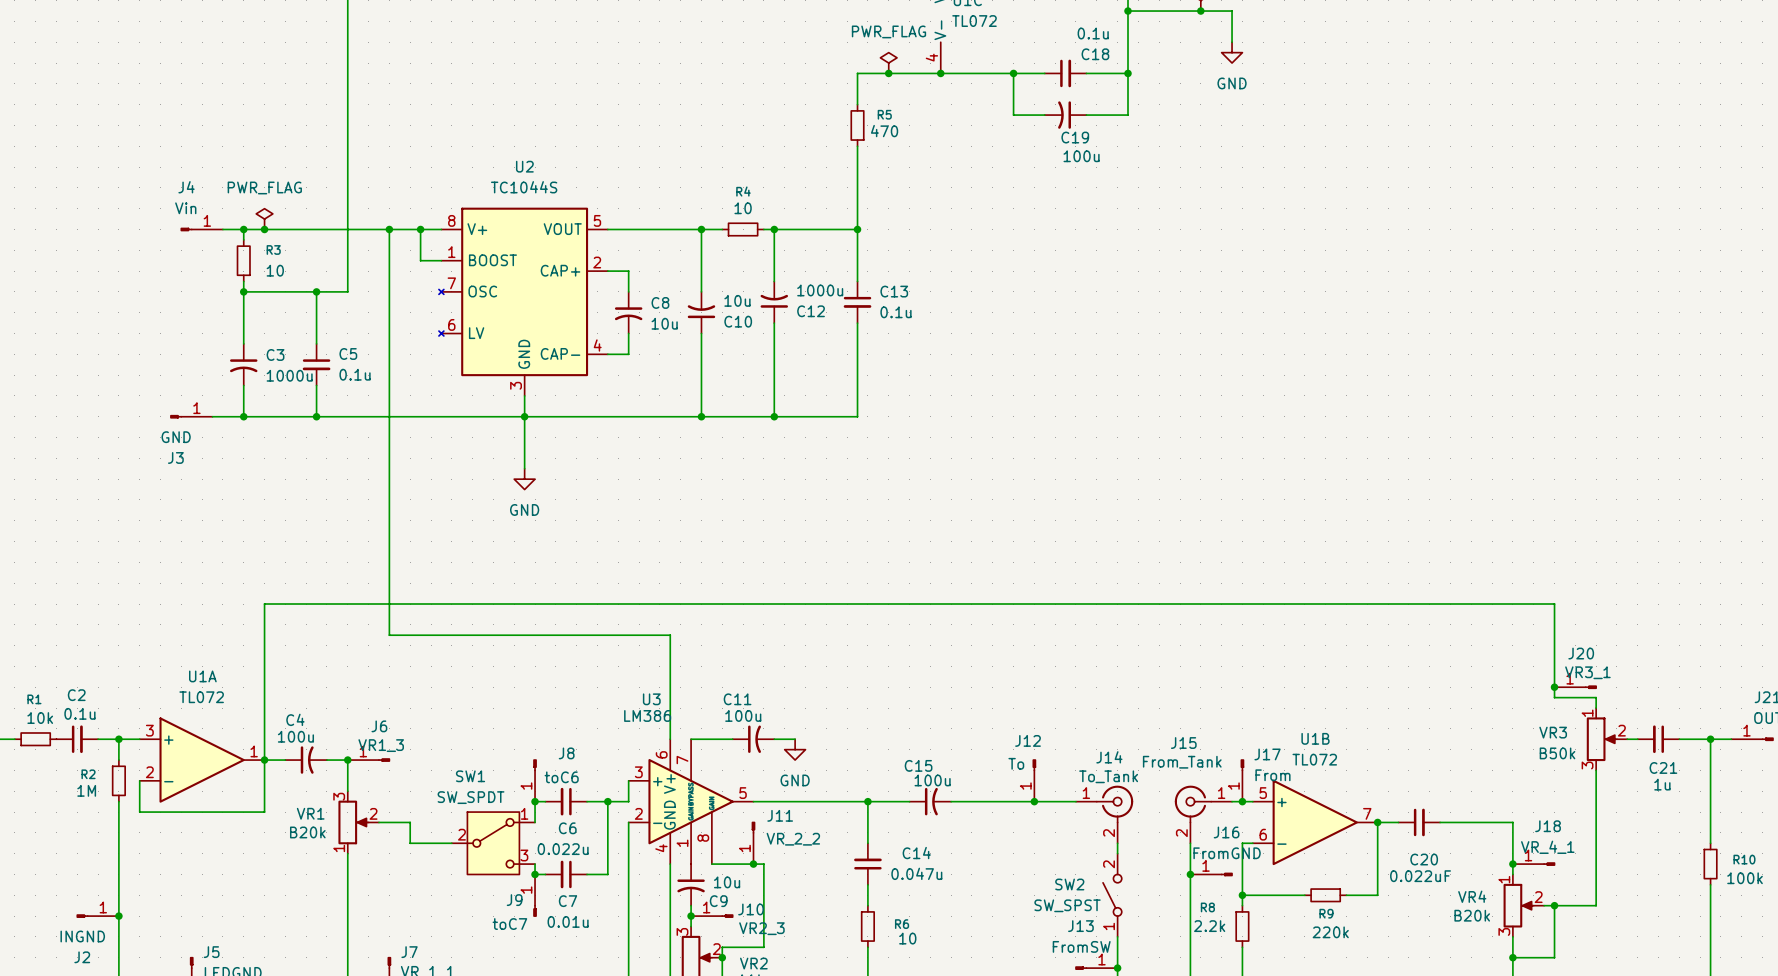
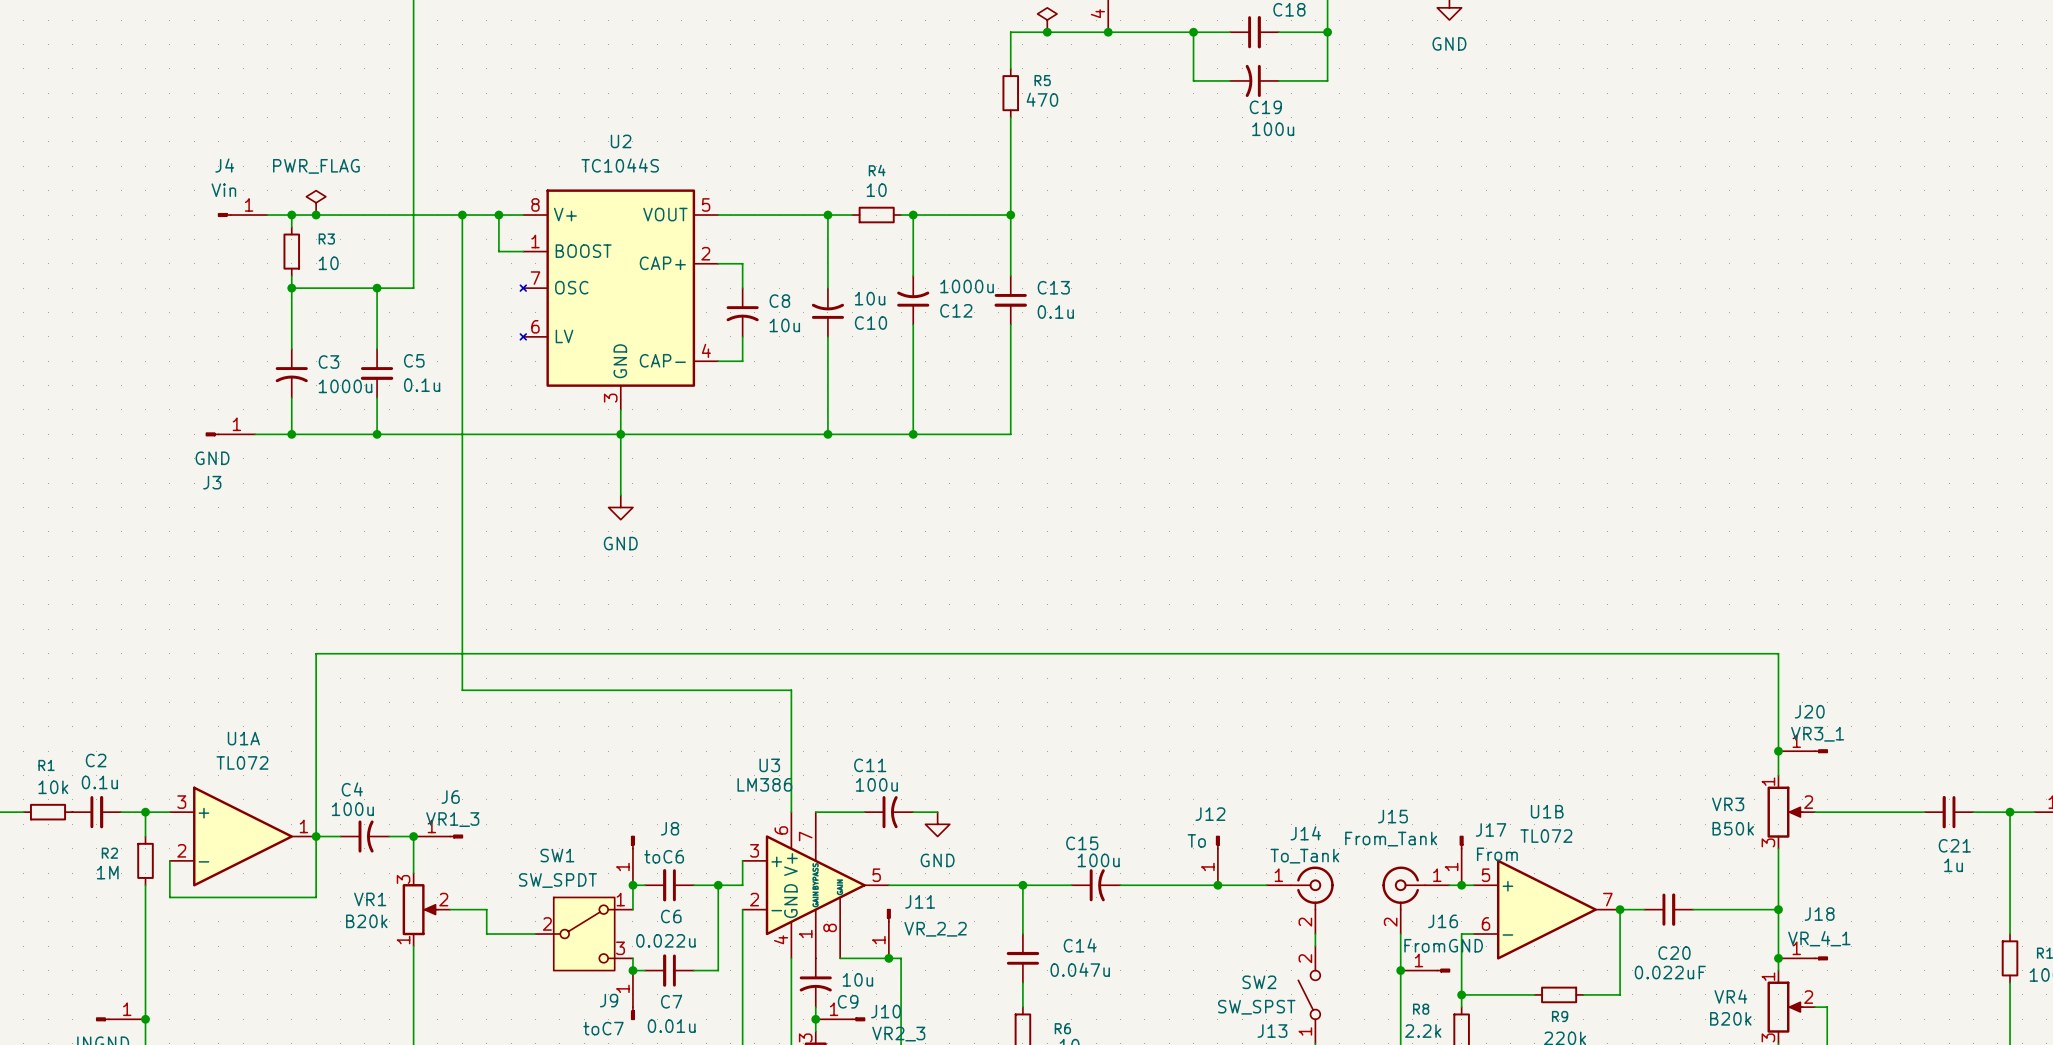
wire: (1512, 604) (1554, 604) (1554, 697) (1596, 697) (1596, 708) -> (1778, 653) (1778, 775)
junction position: (1554, 687) -> (1778, 751)
J20 position: (1575, 687) -> (1803, 751)
wire: none -> (1815, 812) (1912, 812)
VR3 position: (1607, 739) -> (1791, 812)
wire: none -> (1778, 848) (1778, 909)
wire: (1596, 770) (1596, 905) (1554, 905) -> none
junction: none -> (1778, 909)
junction: (1554, 905) -> none

